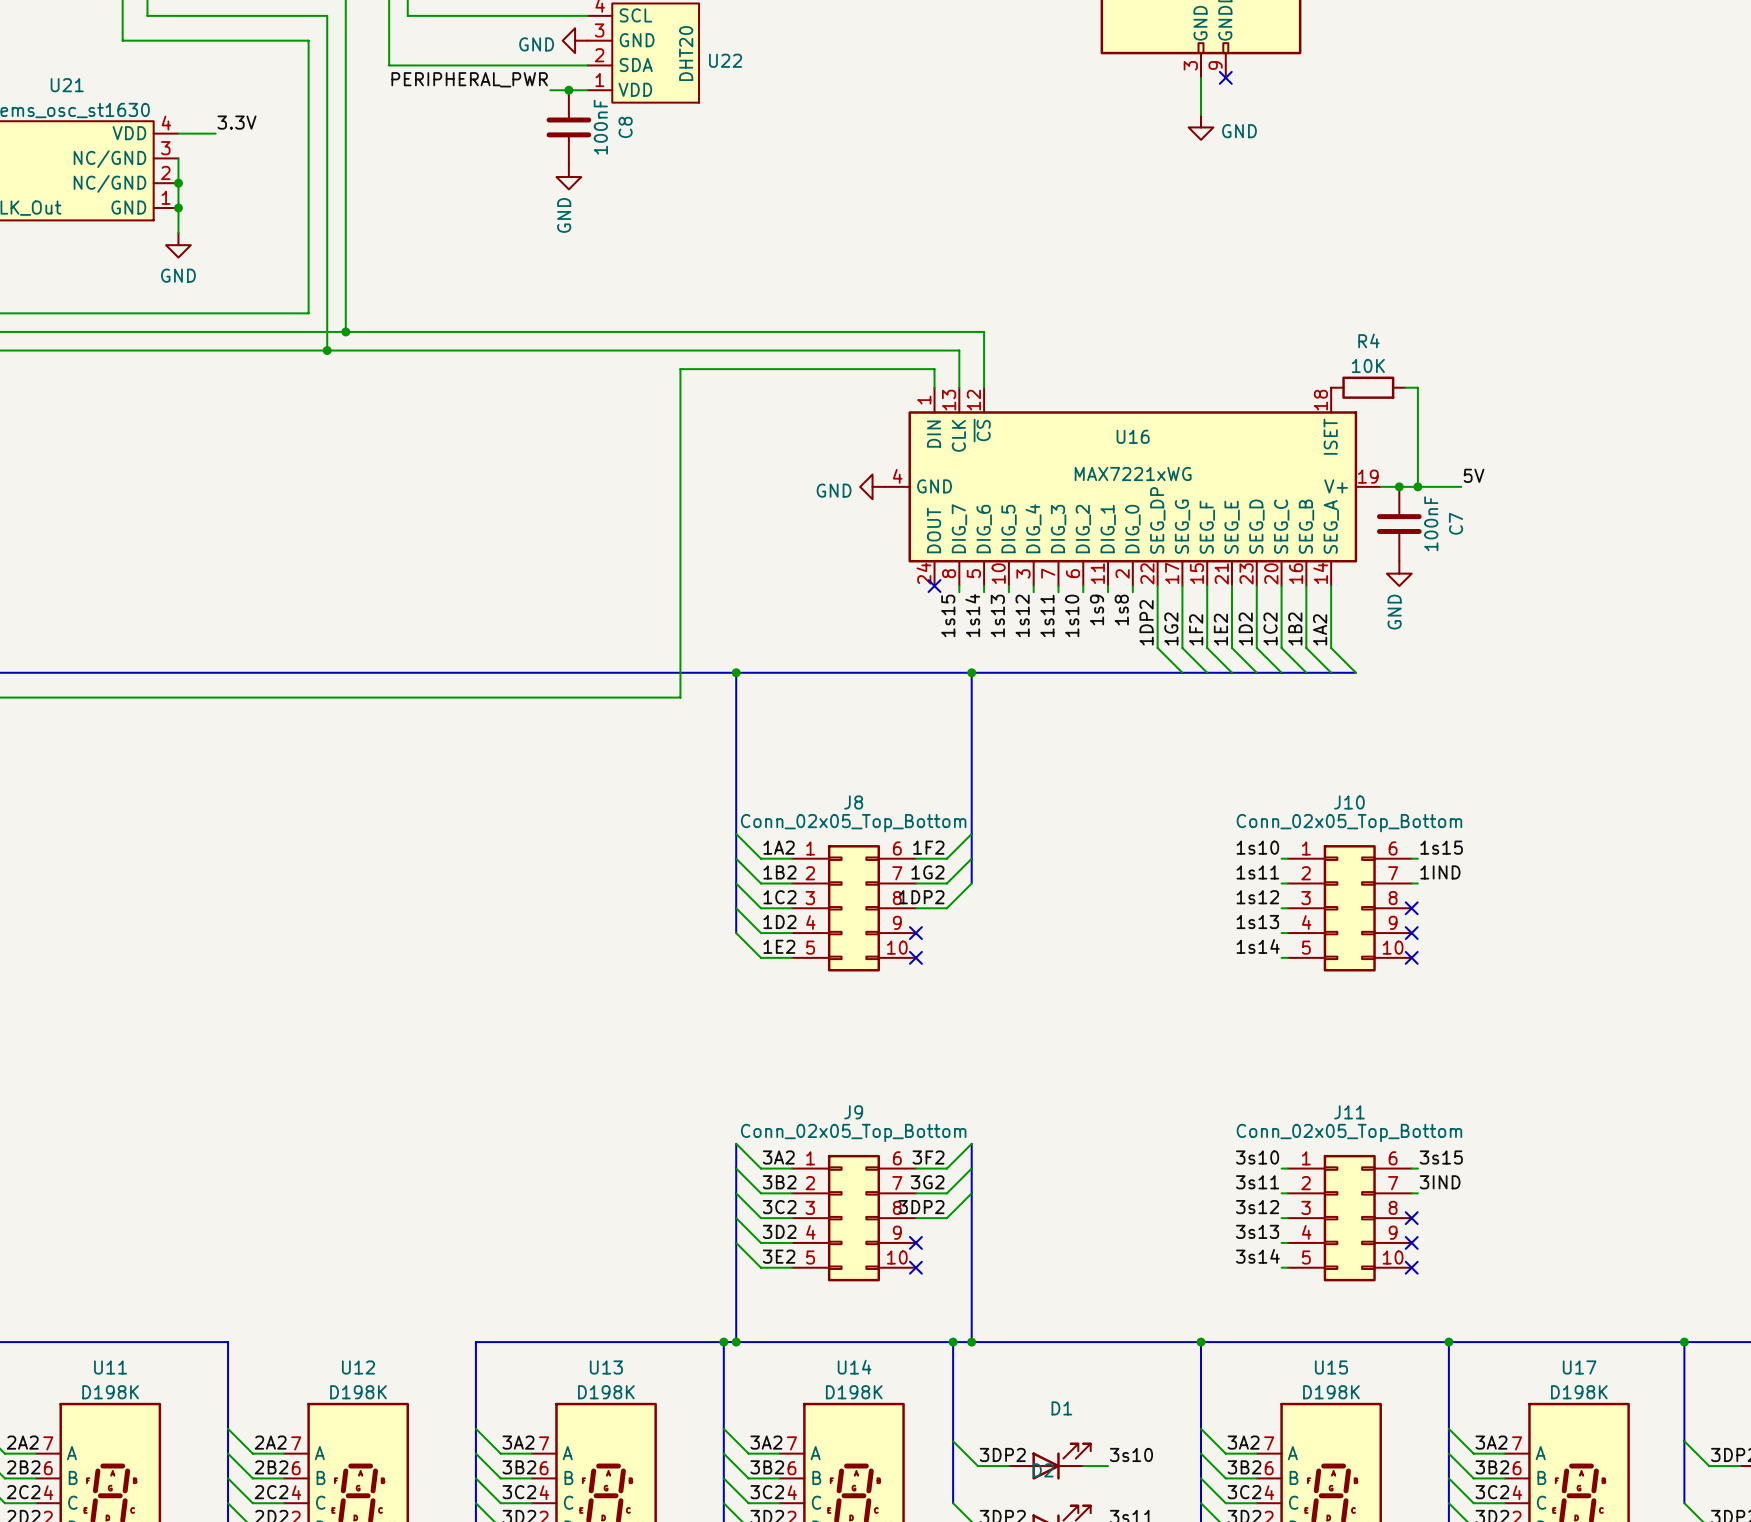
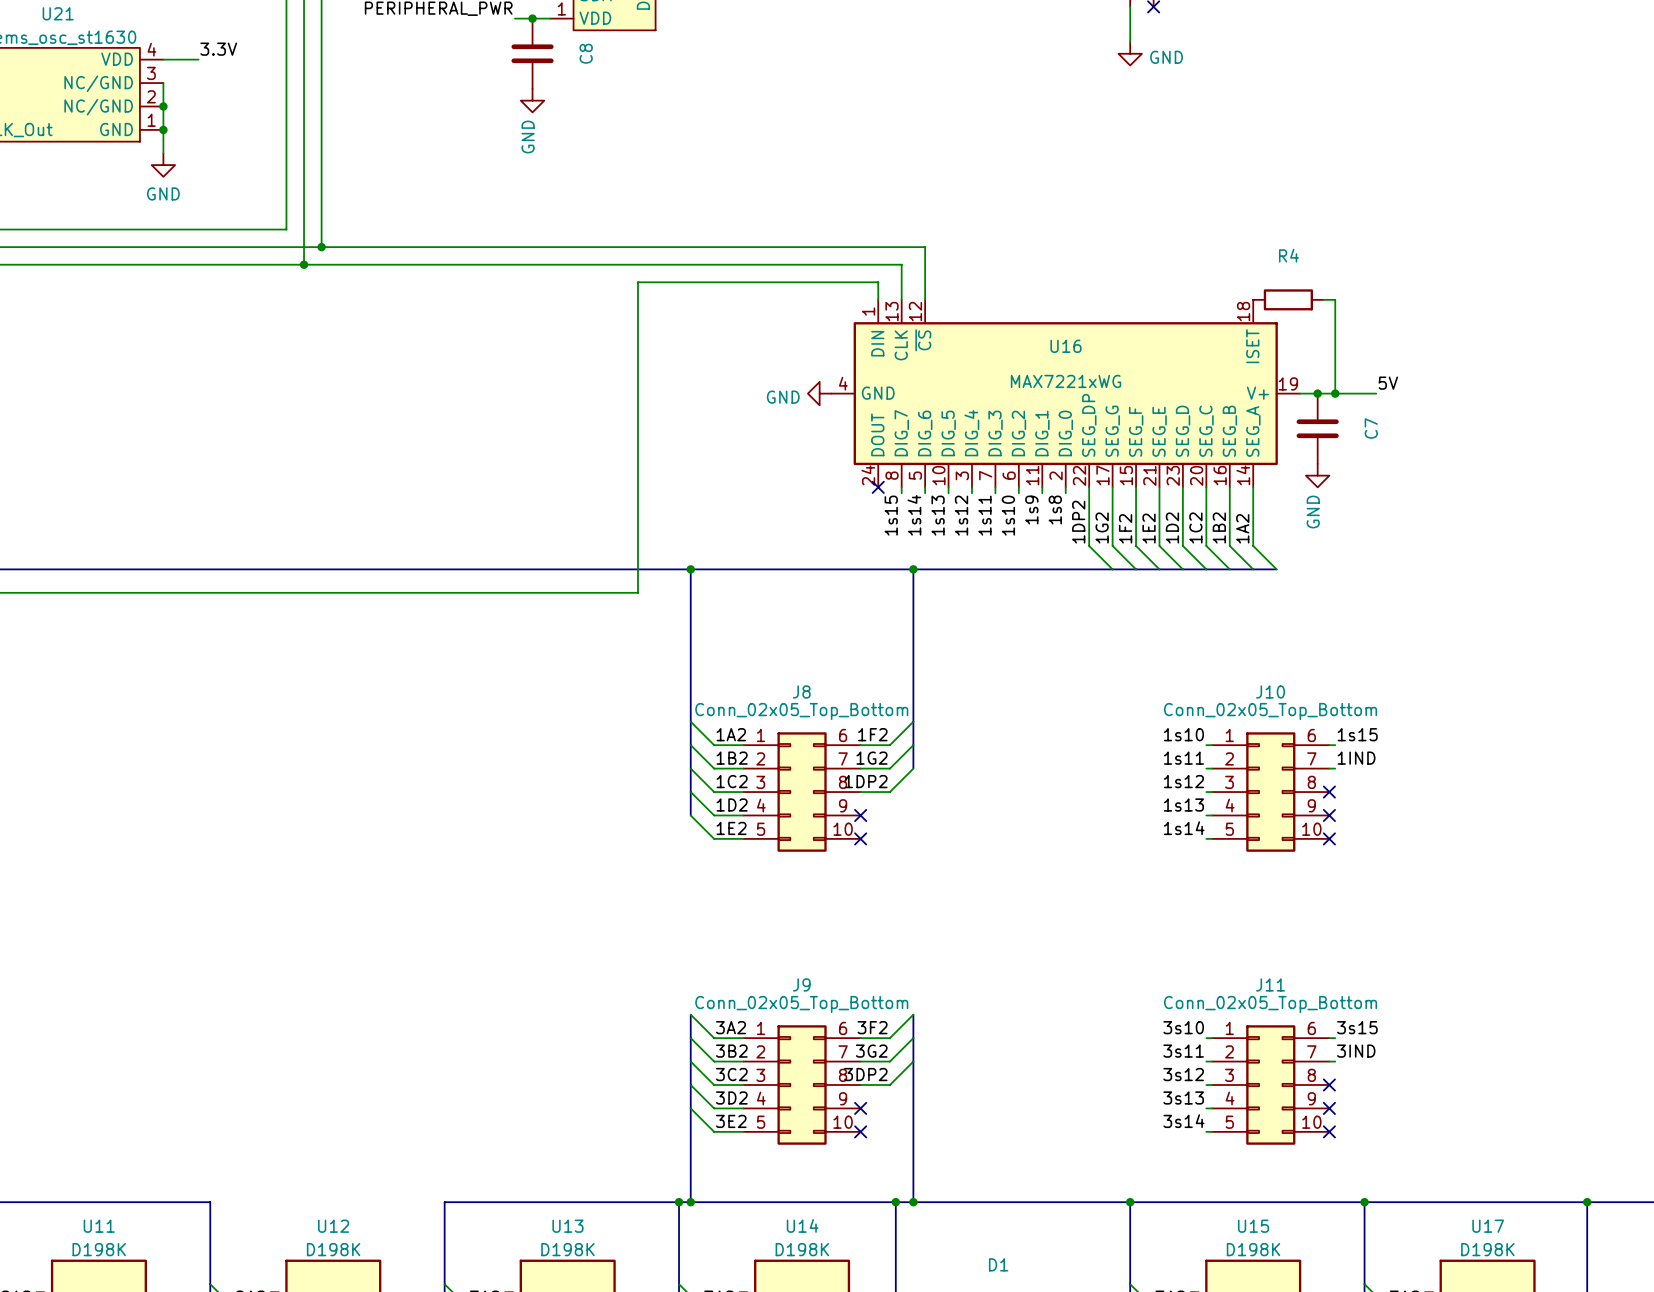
C8 value: 100nF (600, 127) -> none
R4 value: 10K (1368, 365) -> none
C7 value: 100nF (1431, 523) -> none

